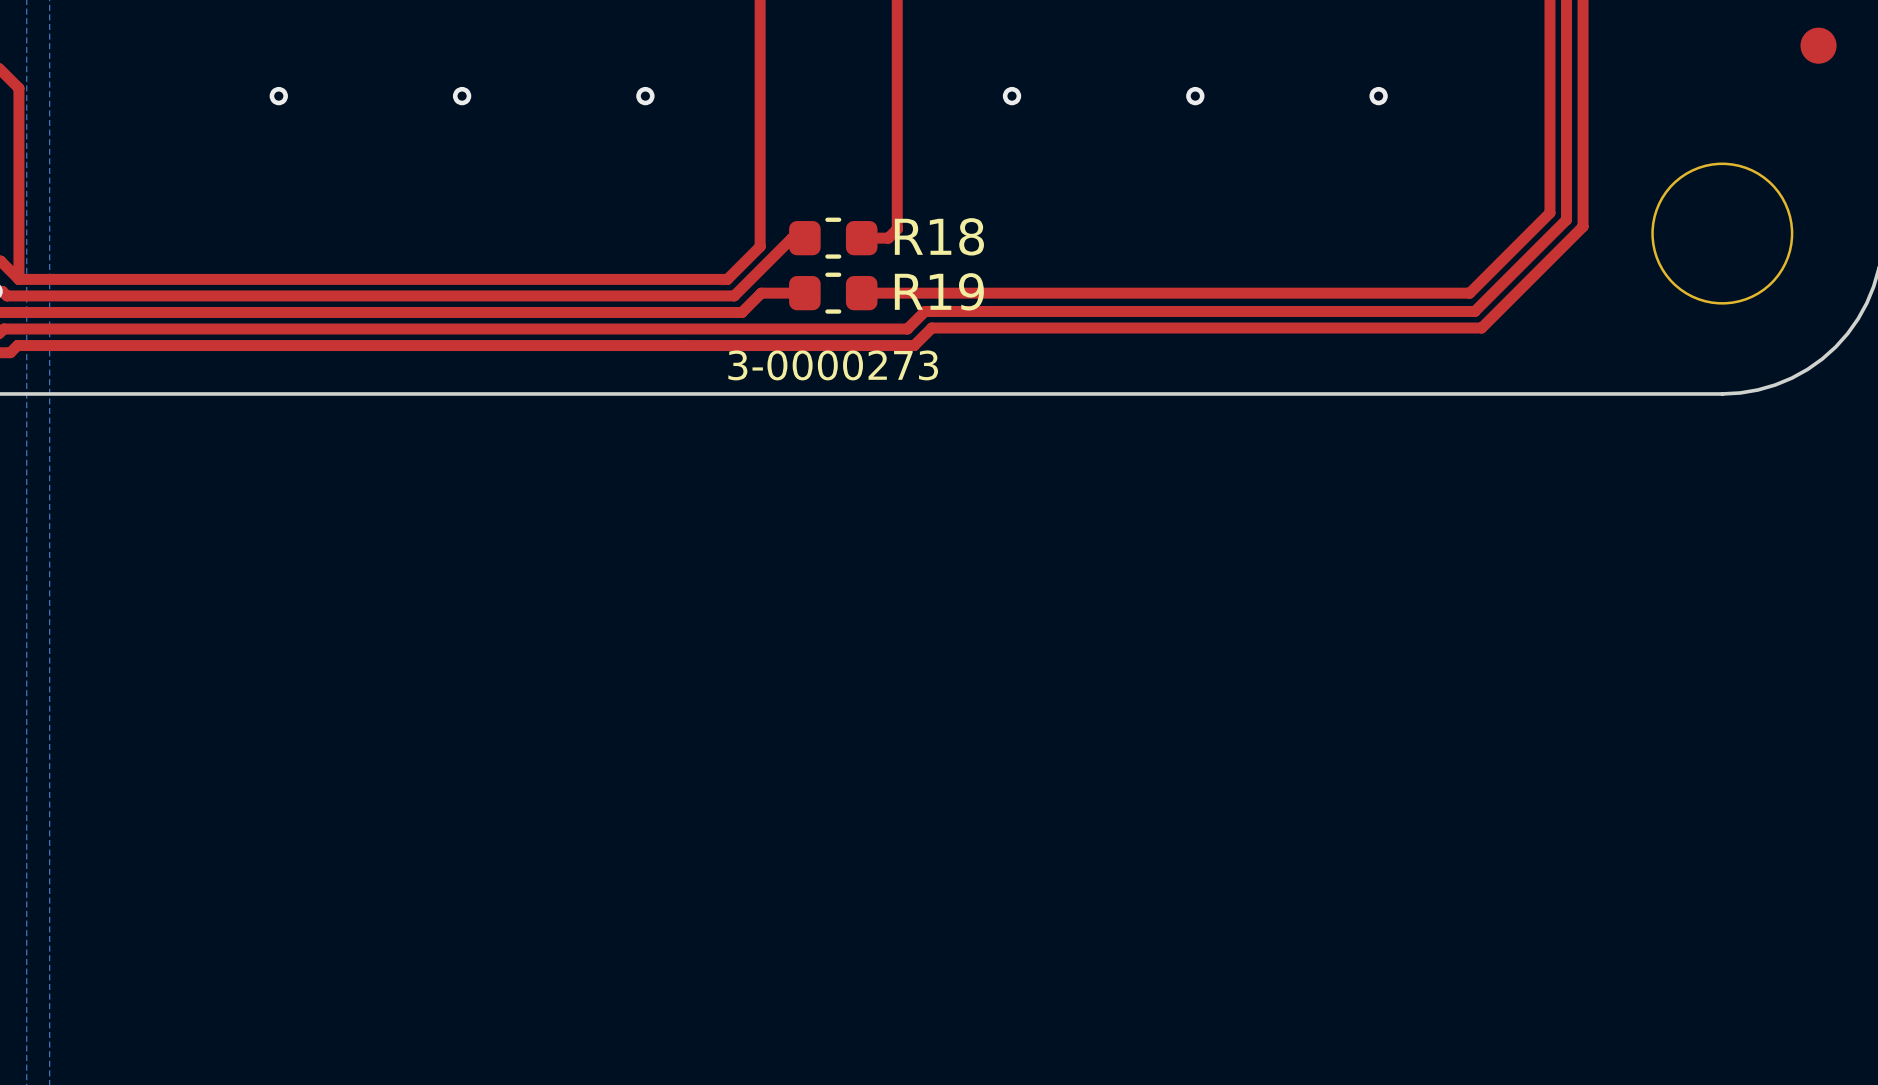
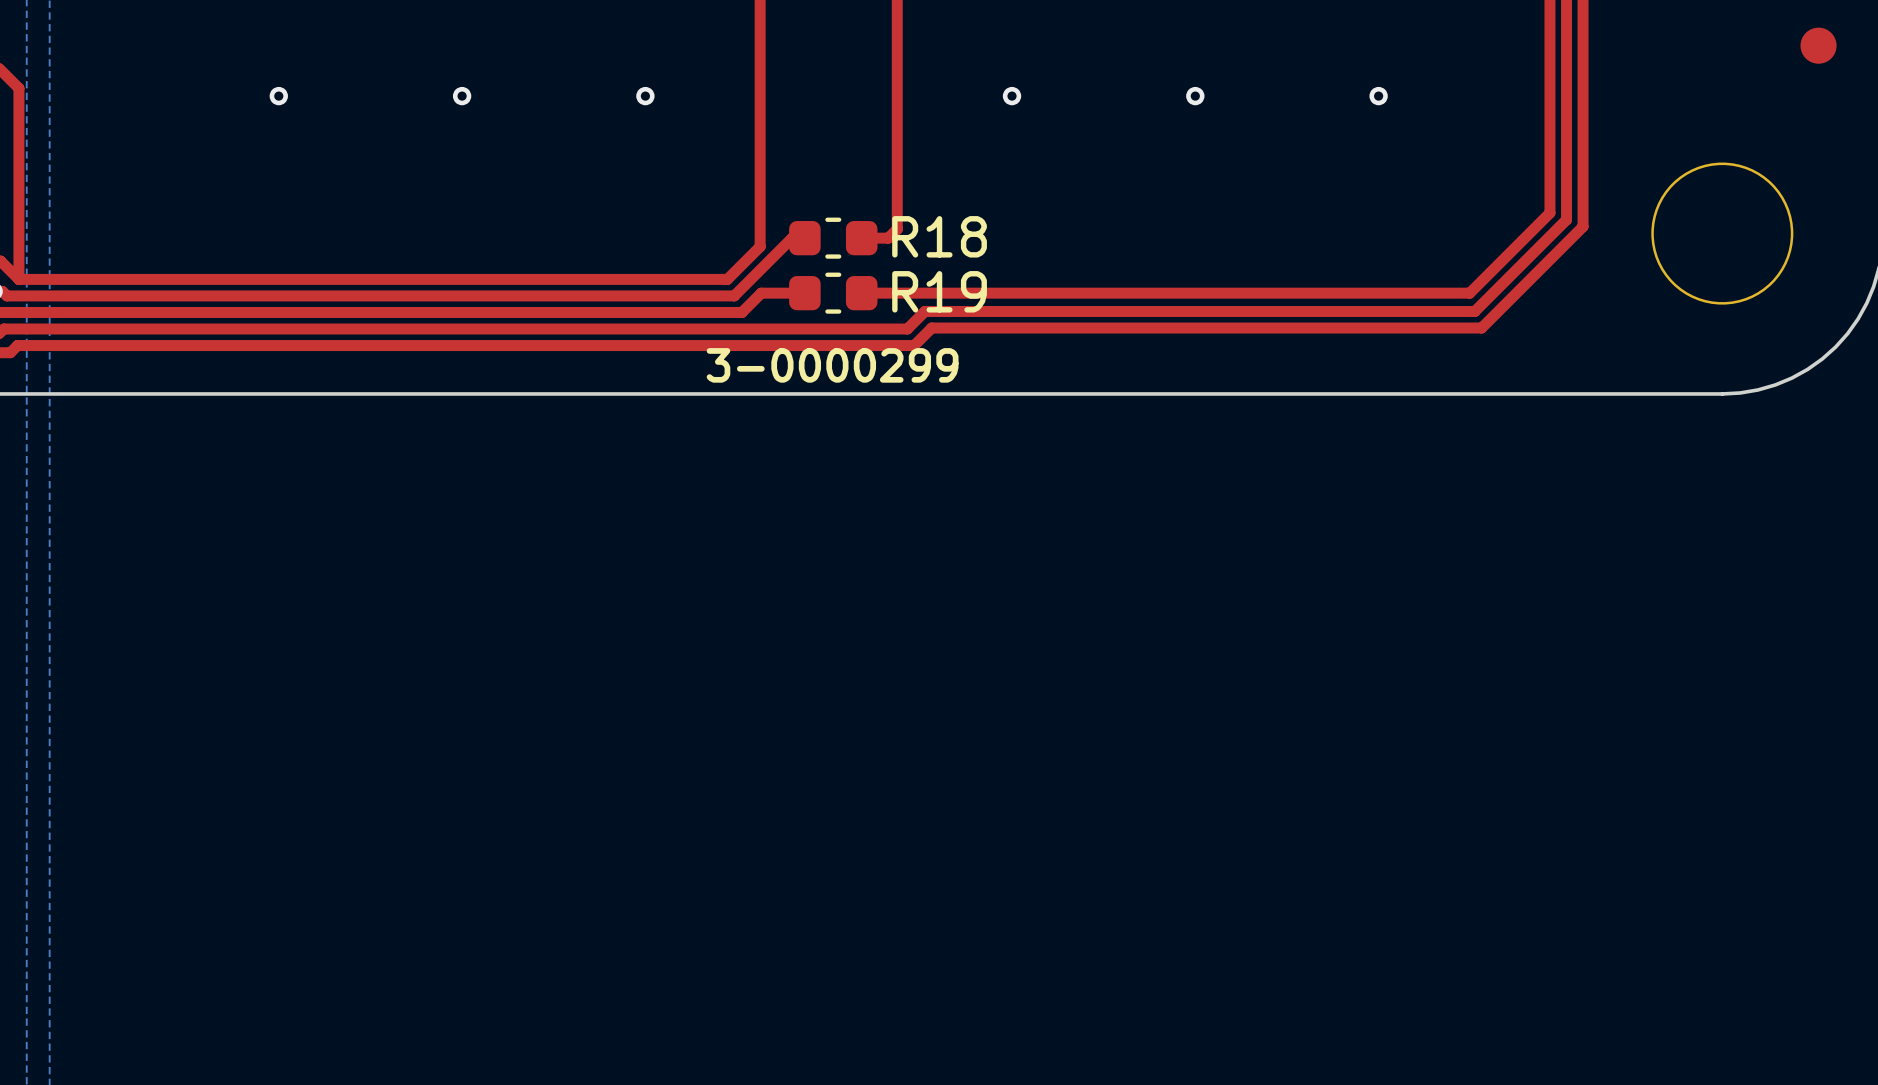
text: 3-0000273 (833, 365) -> 3-0000299 (832, 365)

